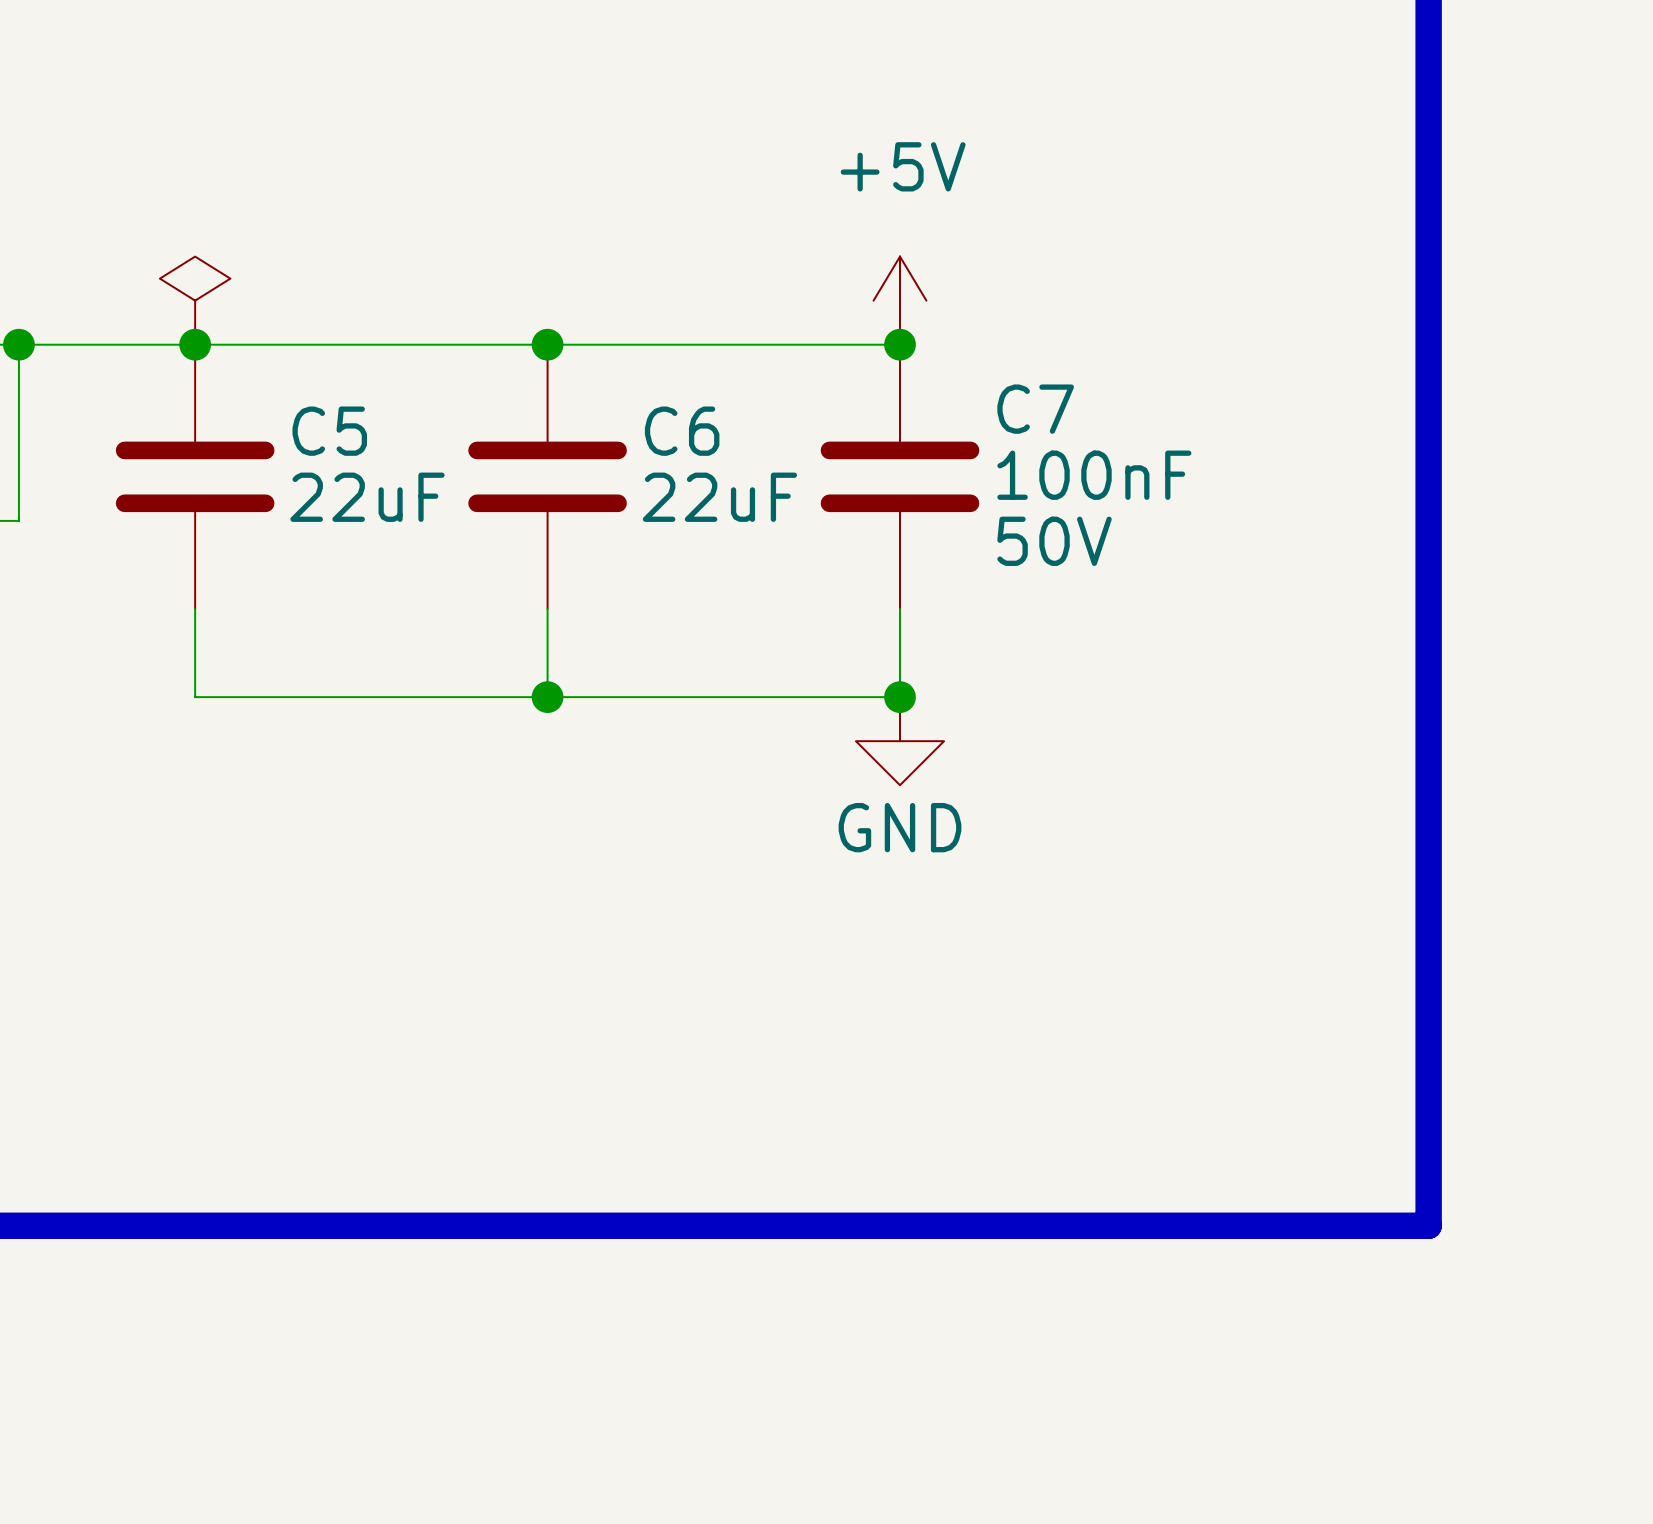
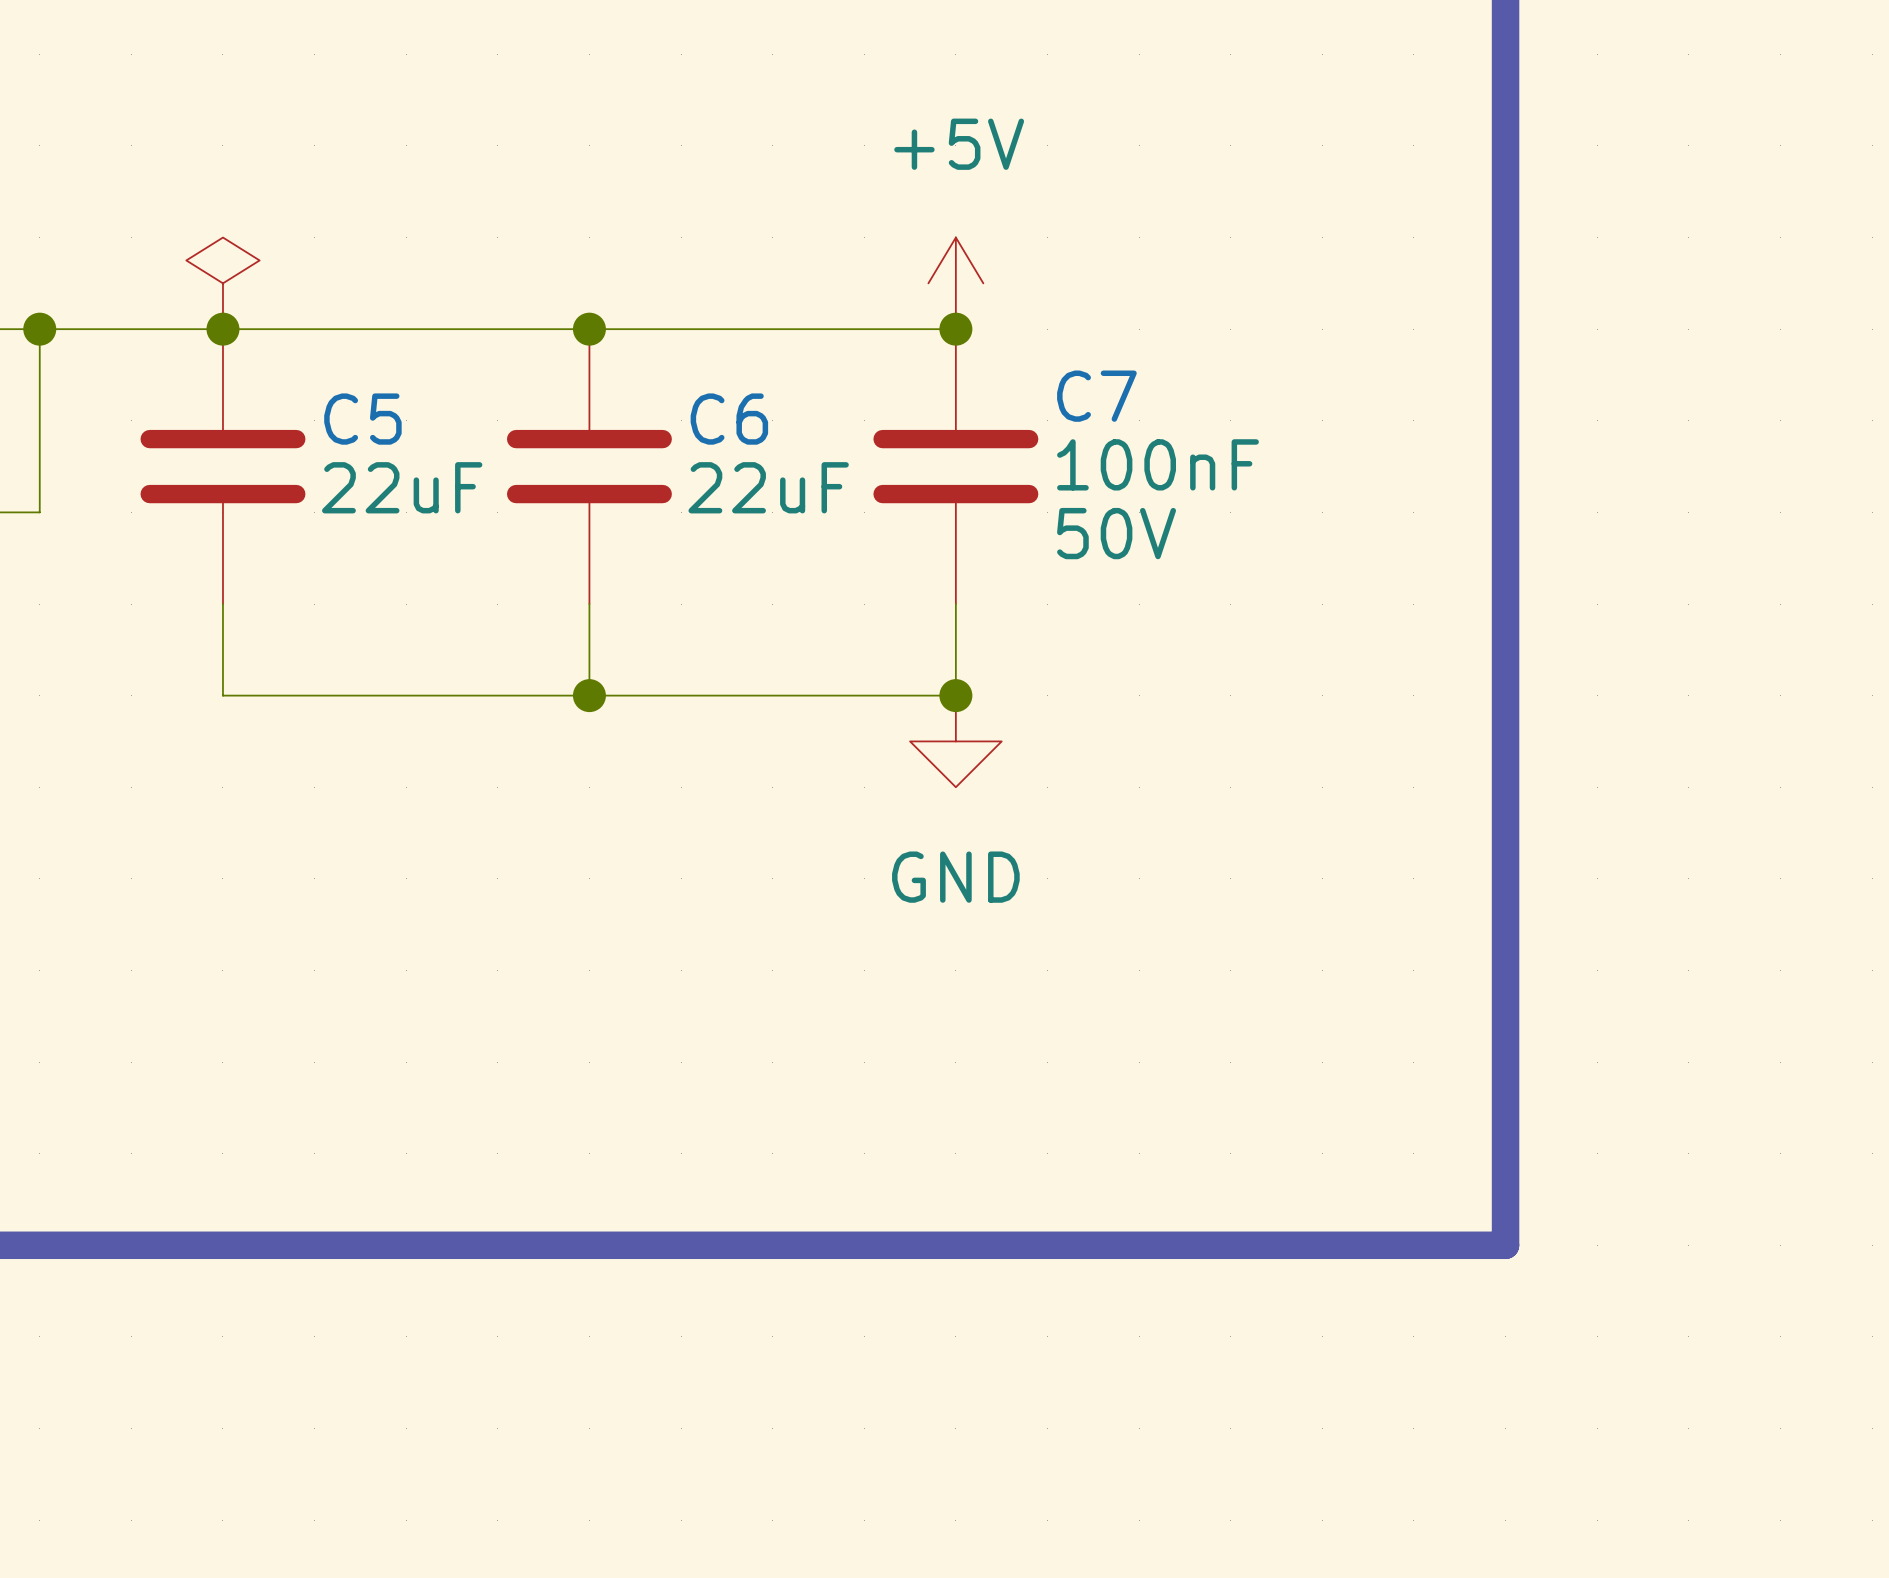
power symbol text position: GND (900, 827) -> GND (955, 877)

